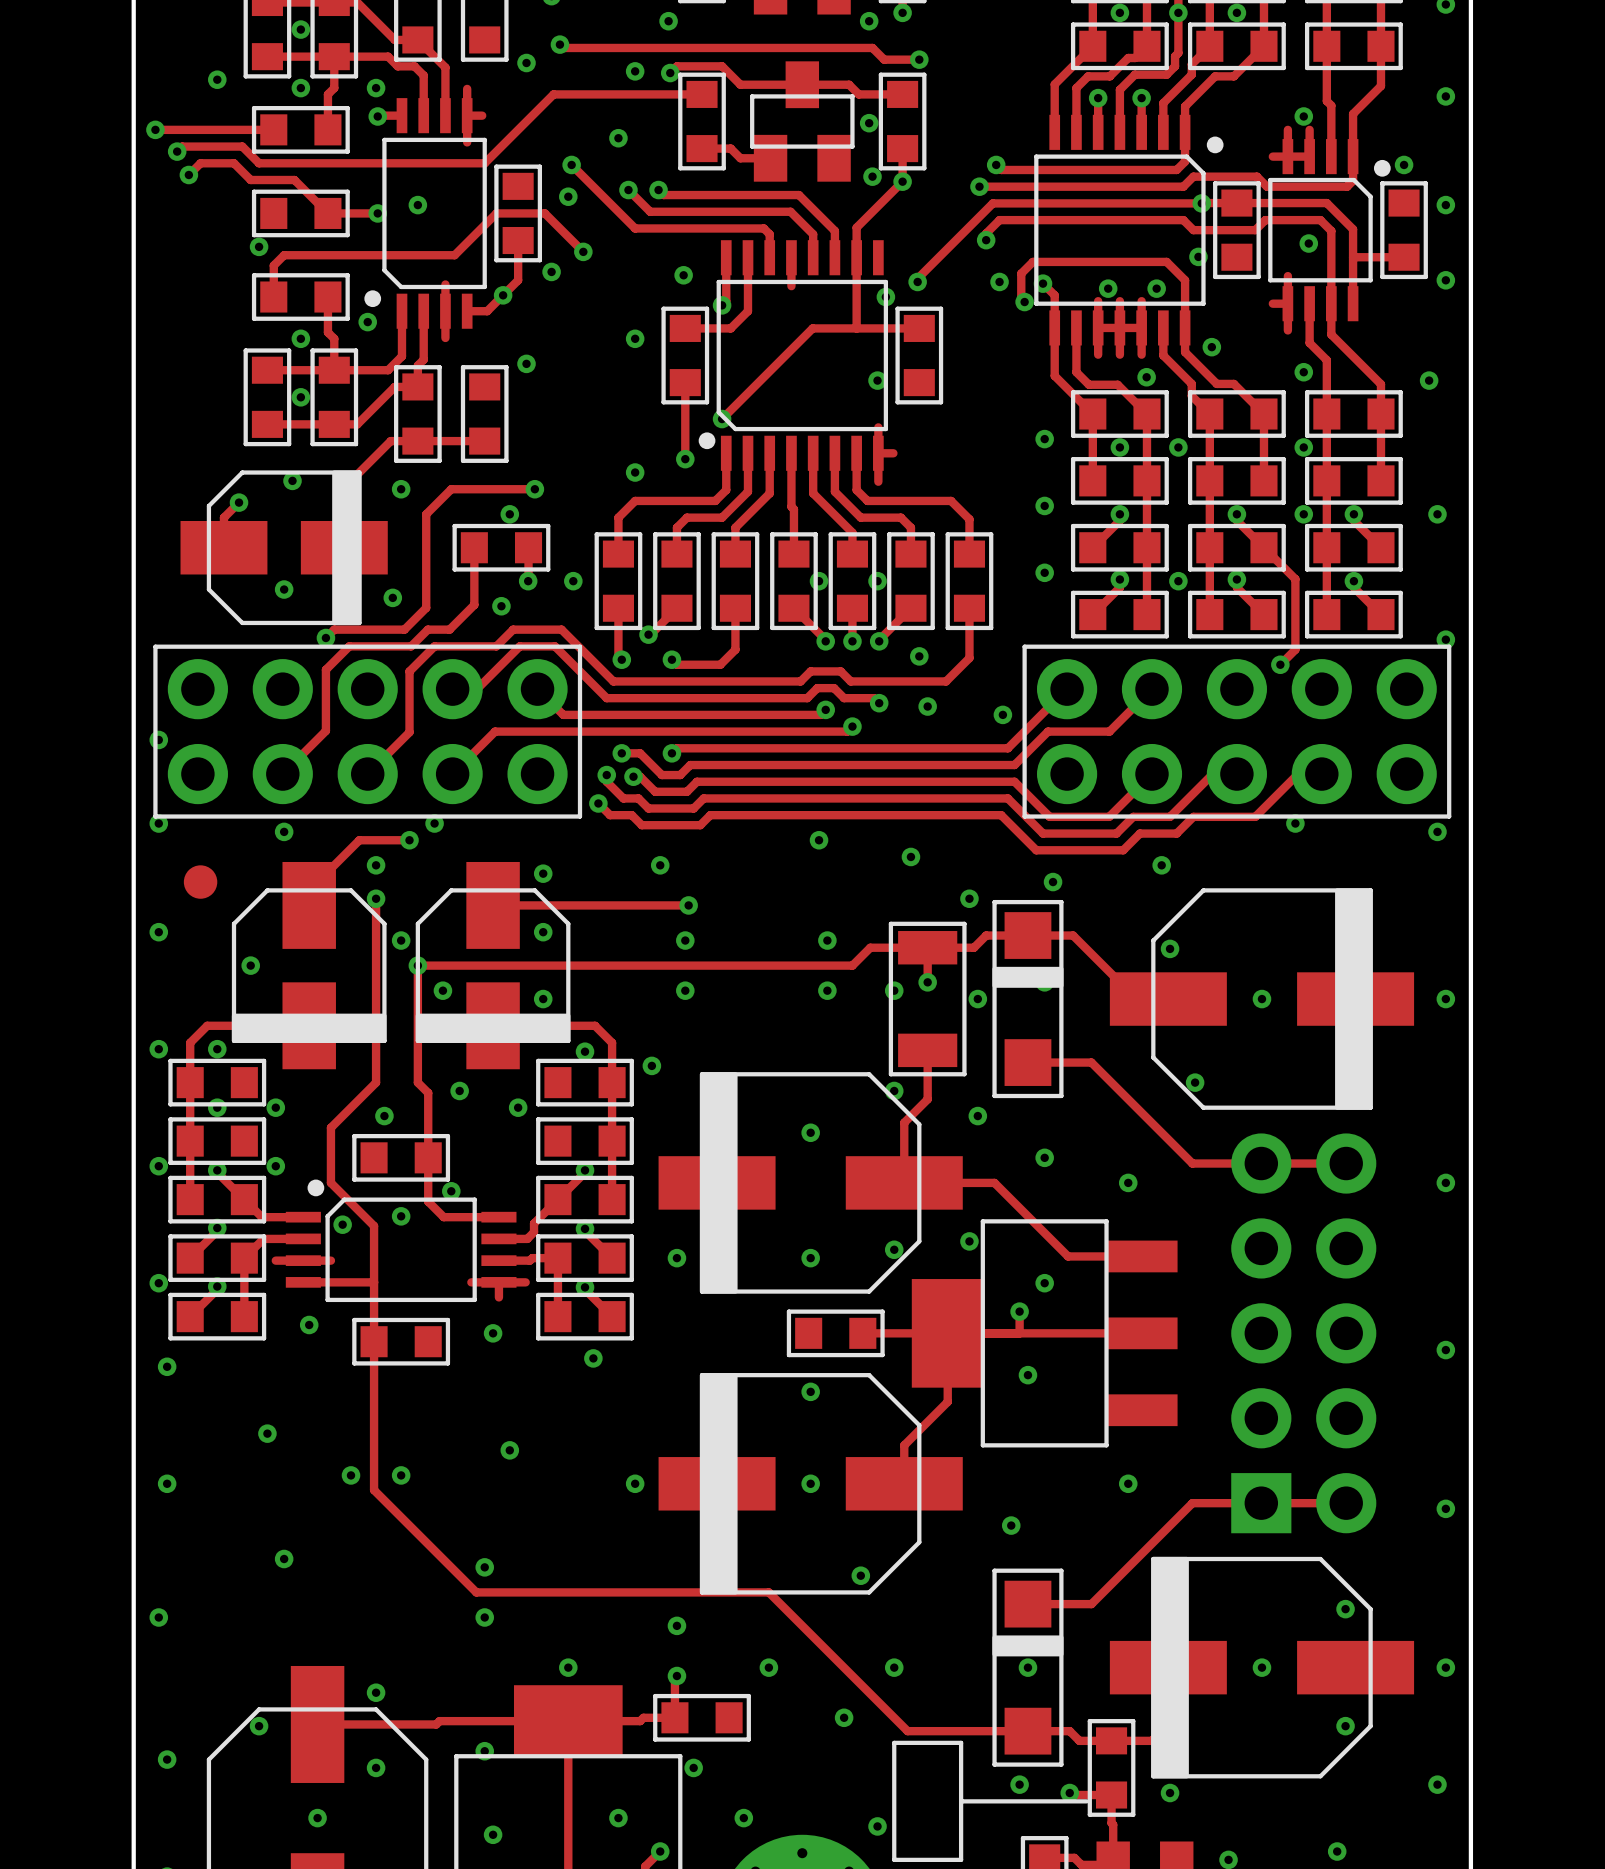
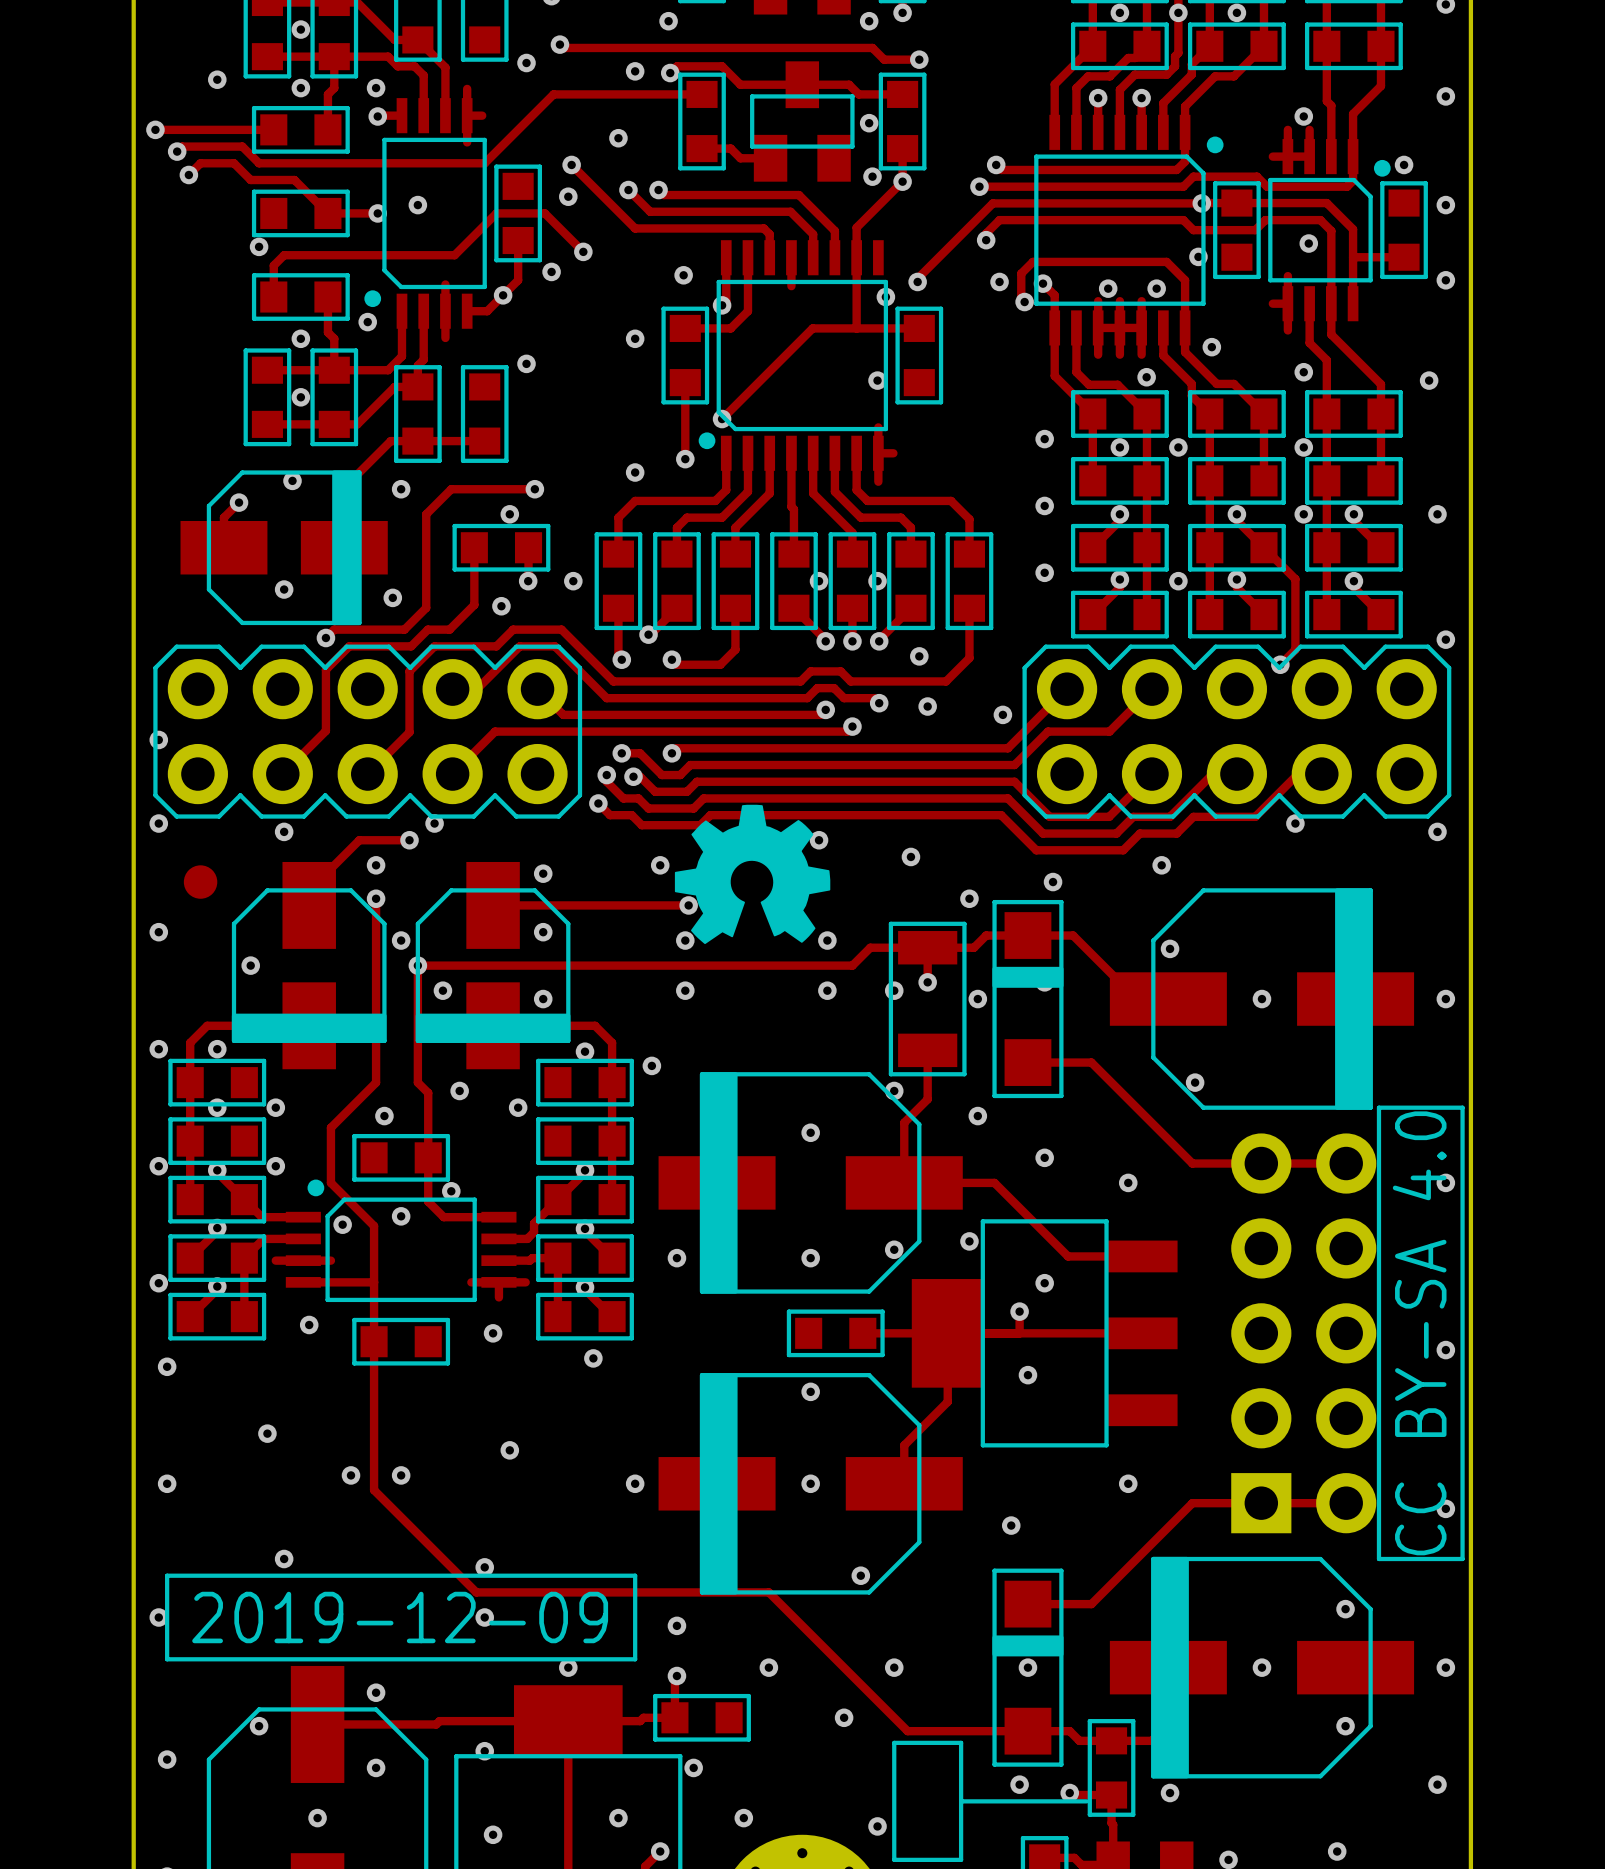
part footprint: [153, 644, 583, 819] -> [153, 644, 583, 819]
part footprint: [1022, 644, 1452, 819] -> [1022, 644, 1452, 819]
drawing: none -> [674, 804, 831, 945]
drawing: none -> [1376, 1105, 1465, 1562]
line: none -> (167, 1575) (635, 1575) (635, 1659) (167, 1659) (167, 1575)
text: none -> 2019-12-09 (400, 1617)

